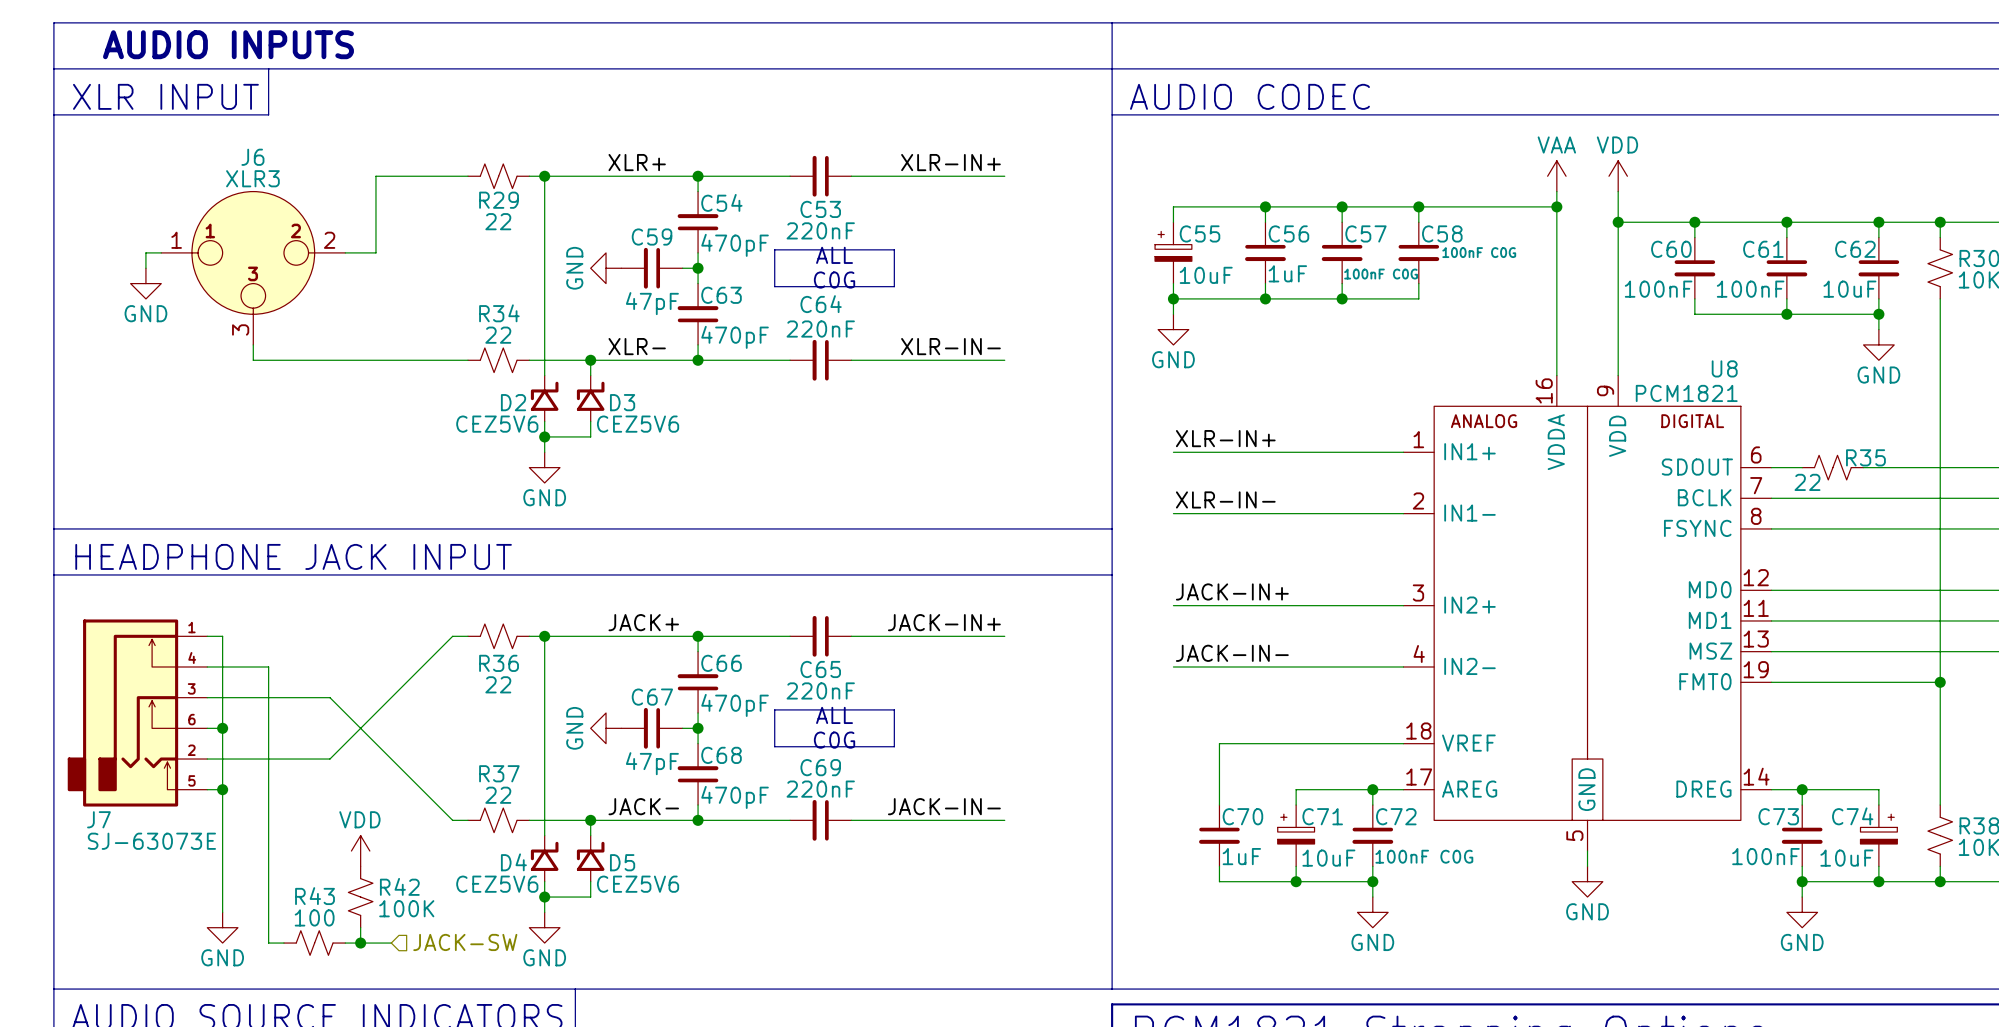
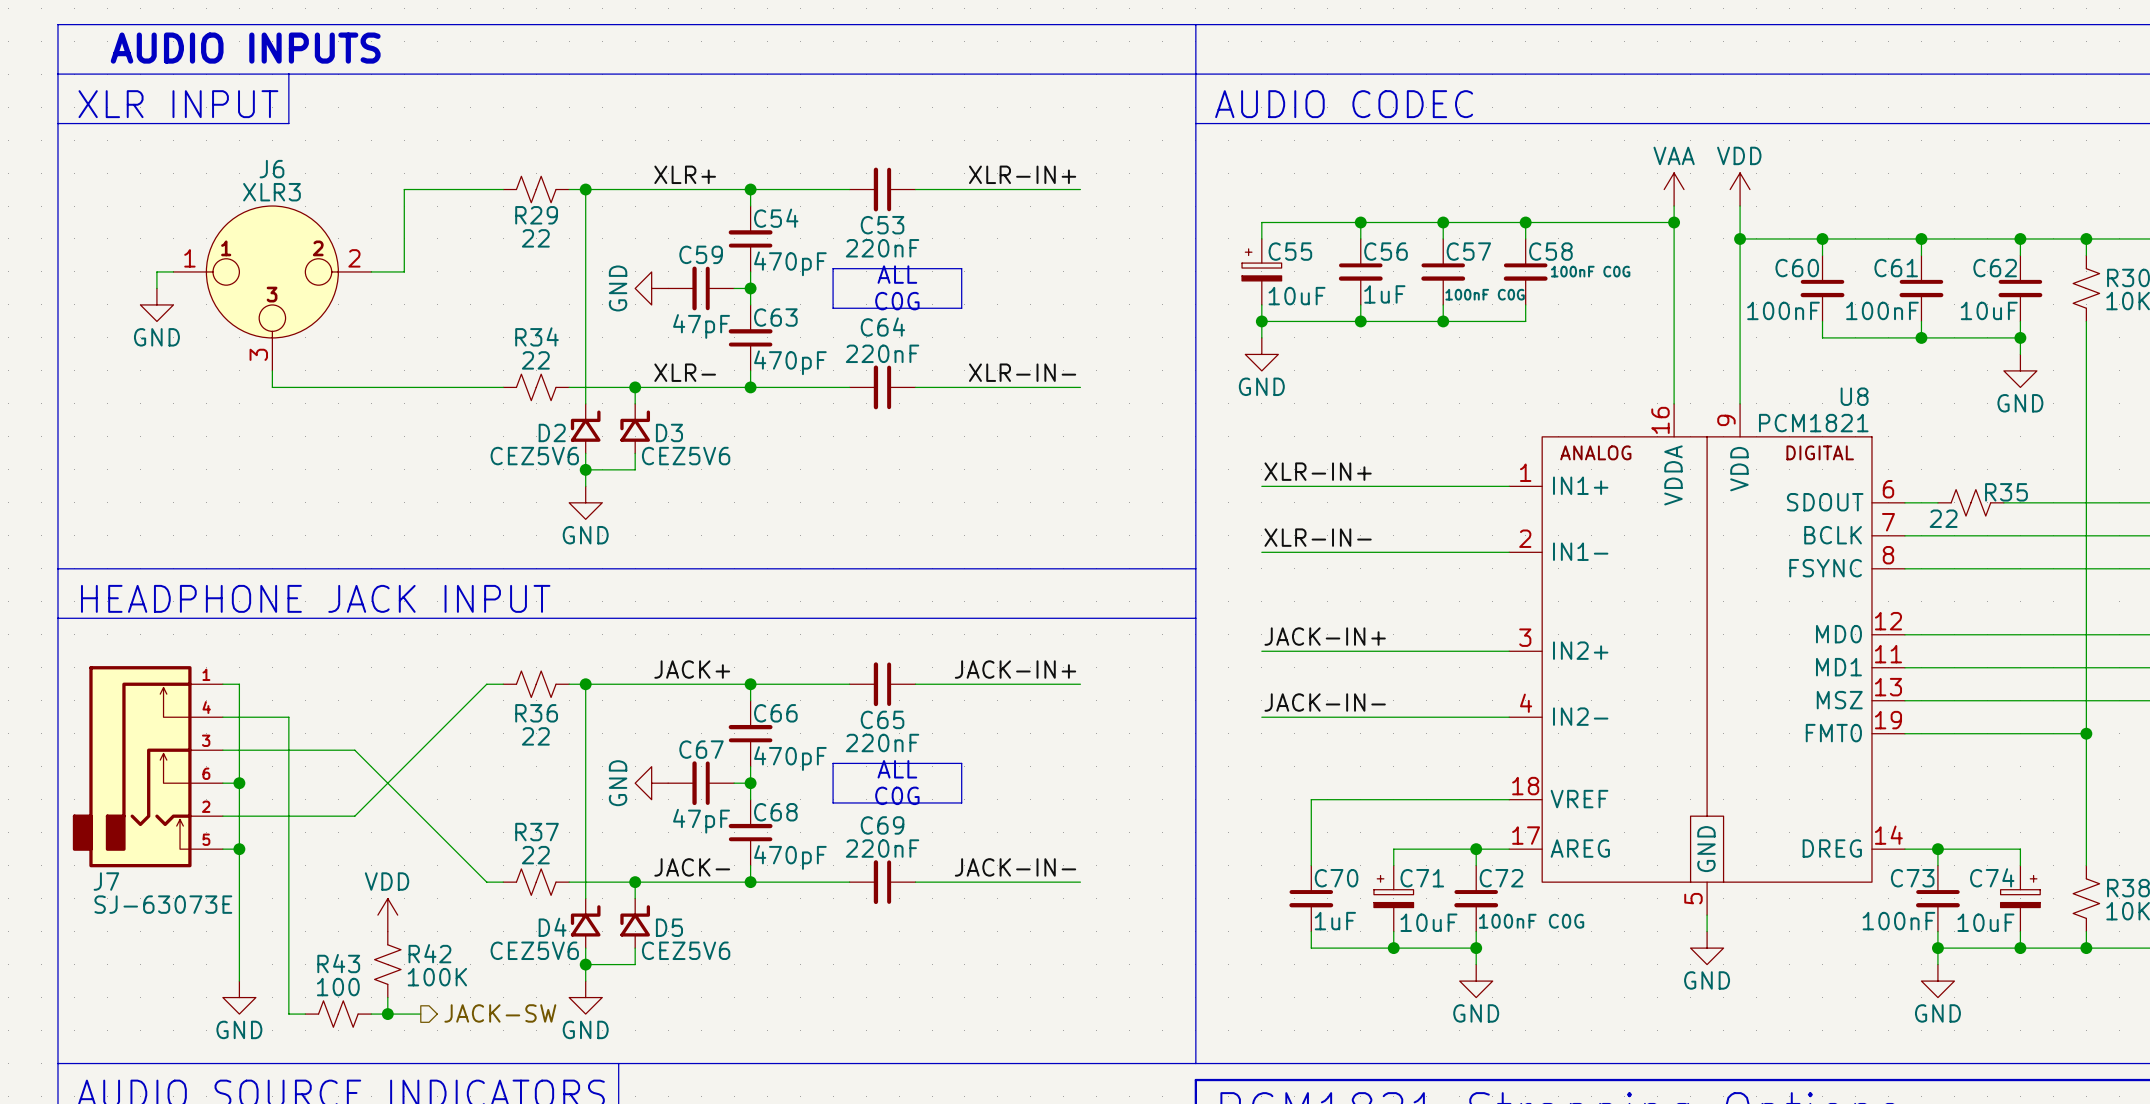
hierarchical label shape: input (465, 942) -> output (500, 1013)

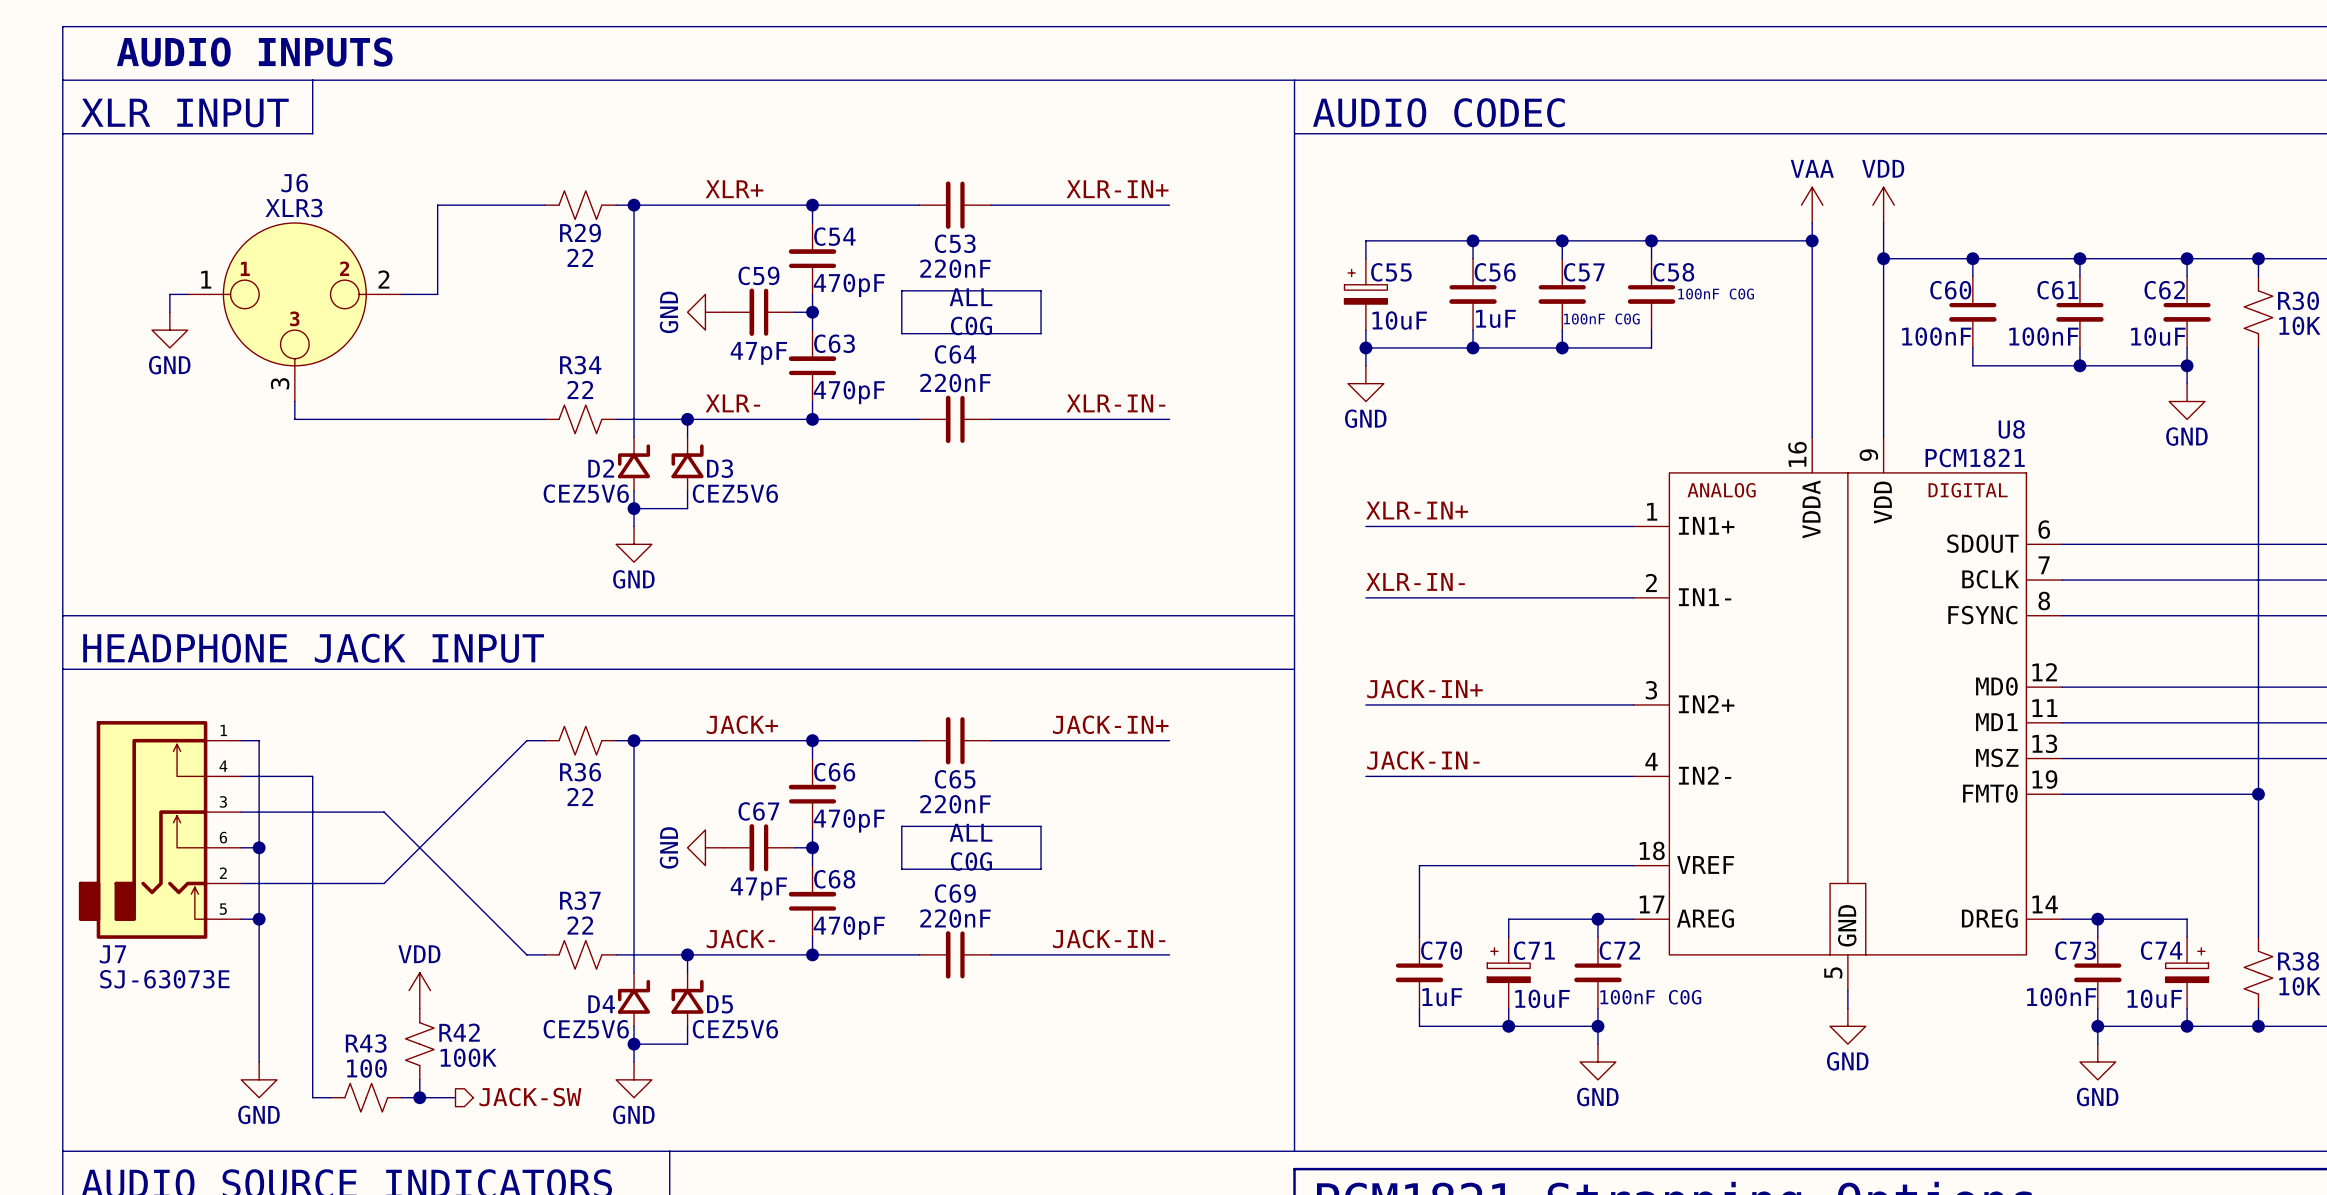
line: (1195, 24) (1195, 74) -> none
wire: none -> (2097, 544) (2169, 544)
R35: 22 (1970, 502) -> none

